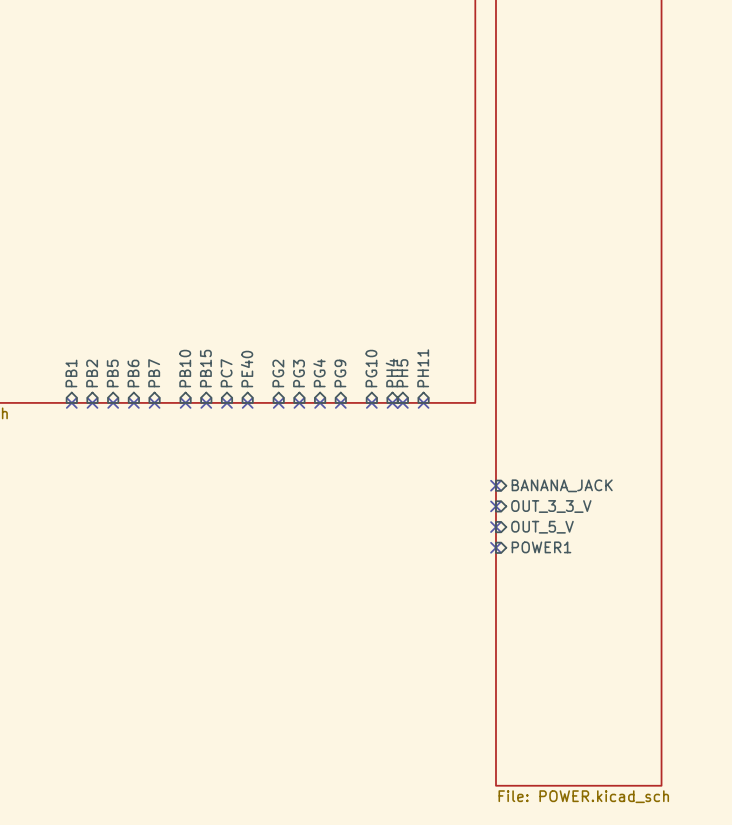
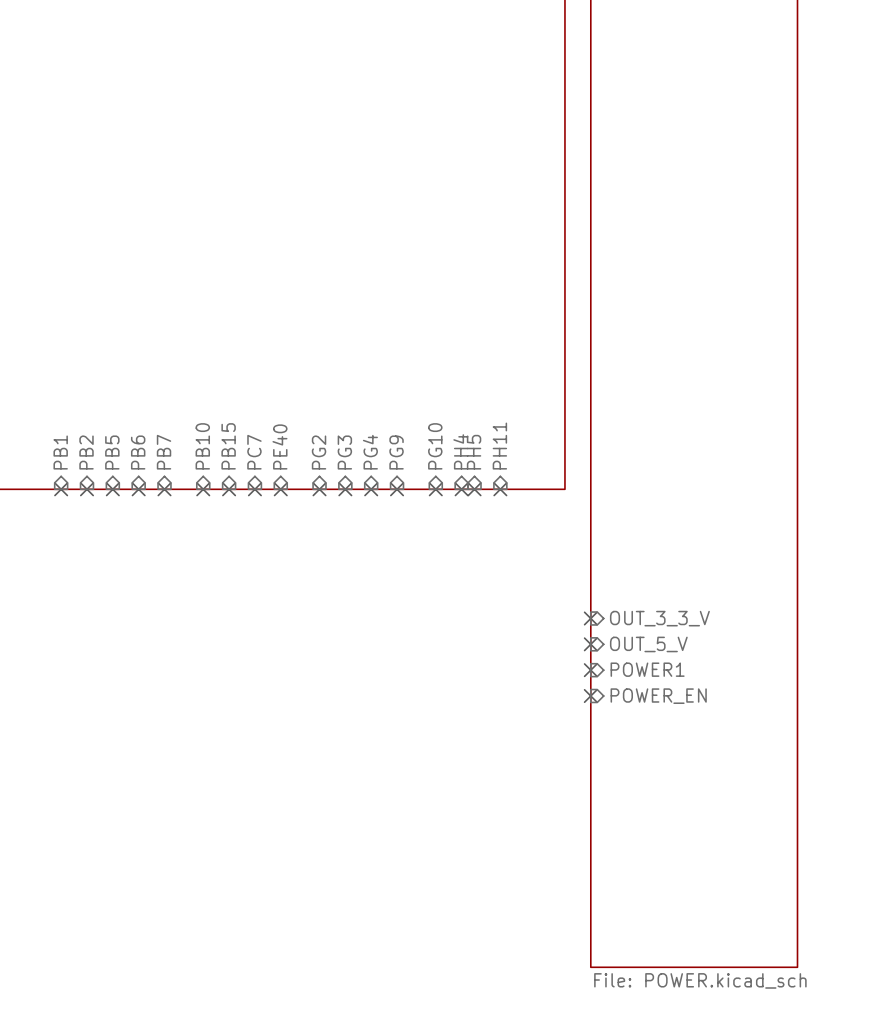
no-connect mark: (495, 485) -> none
sheet pin: BANANA_JACK (562, 485) -> none
no-connect mark: none -> (590, 696)
sheet pin: none -> POWER_EN (658, 696)

